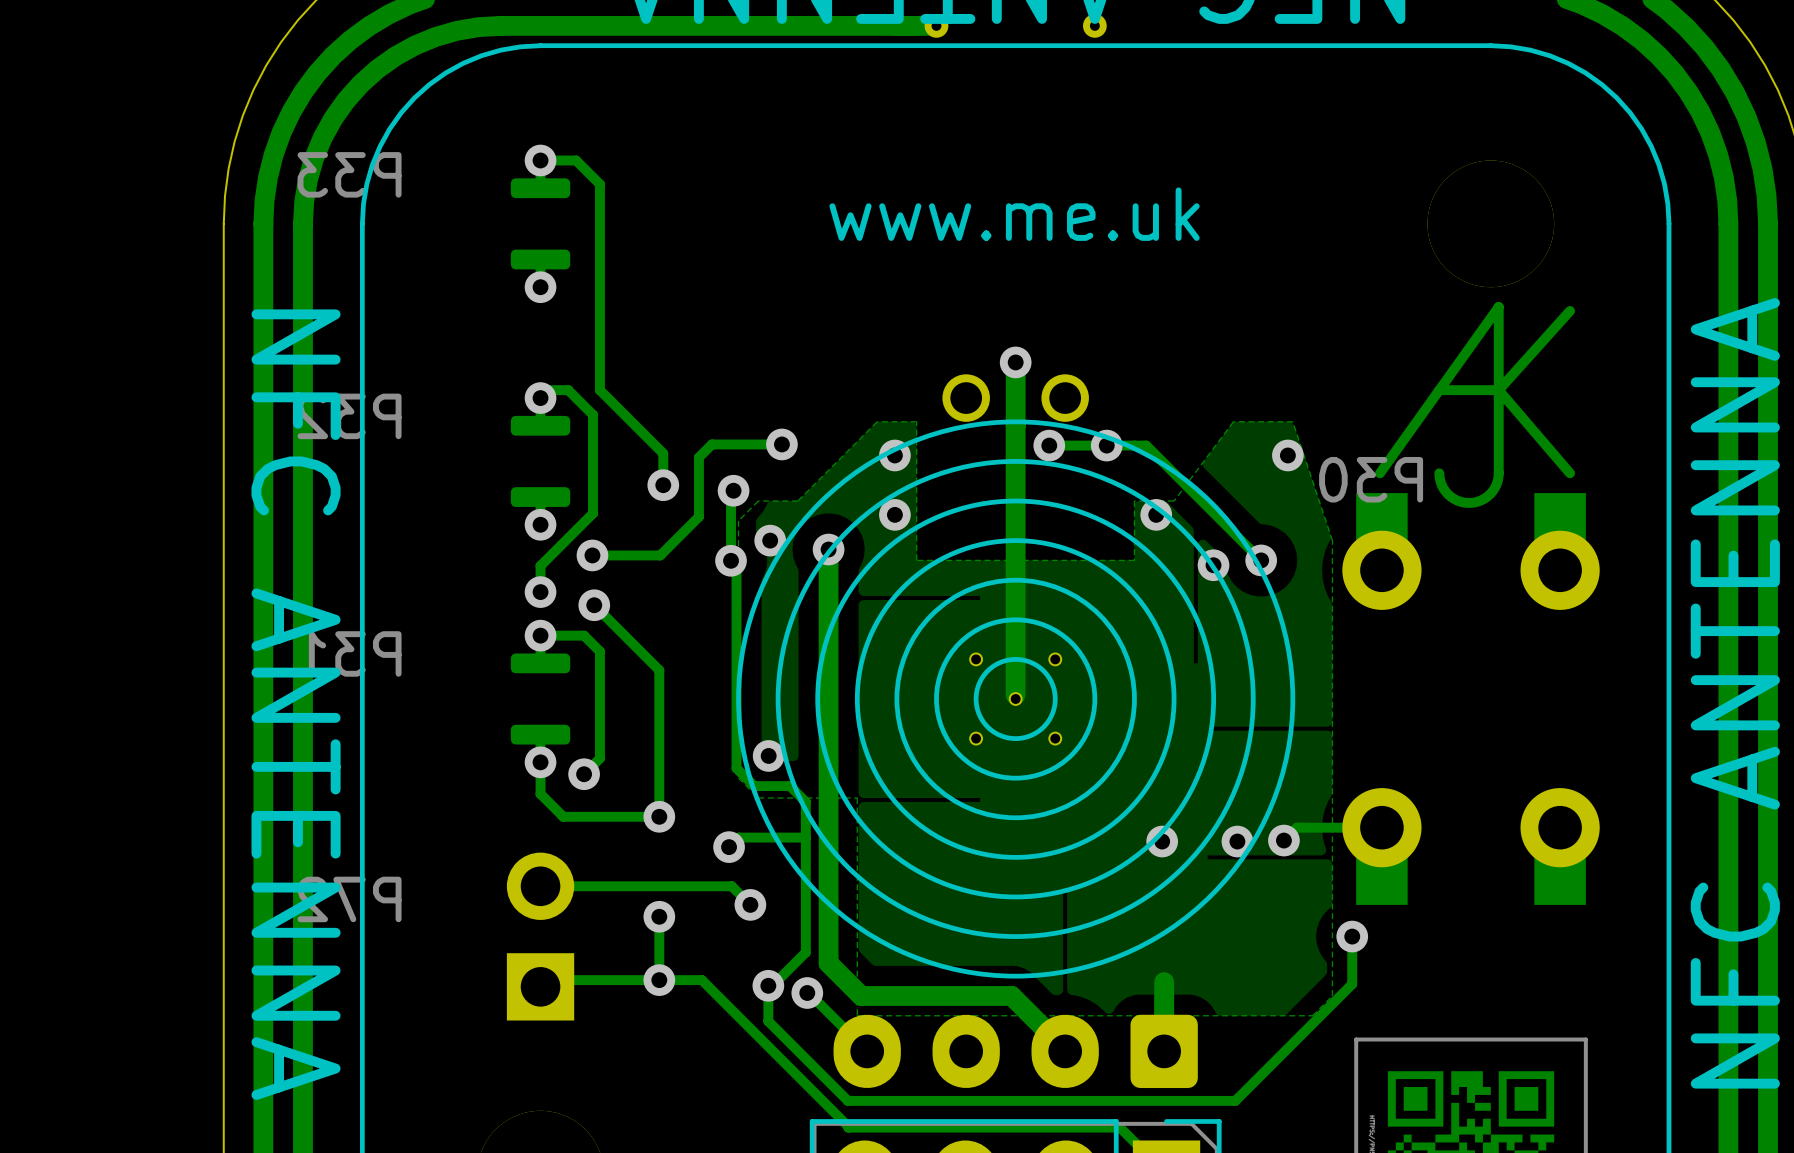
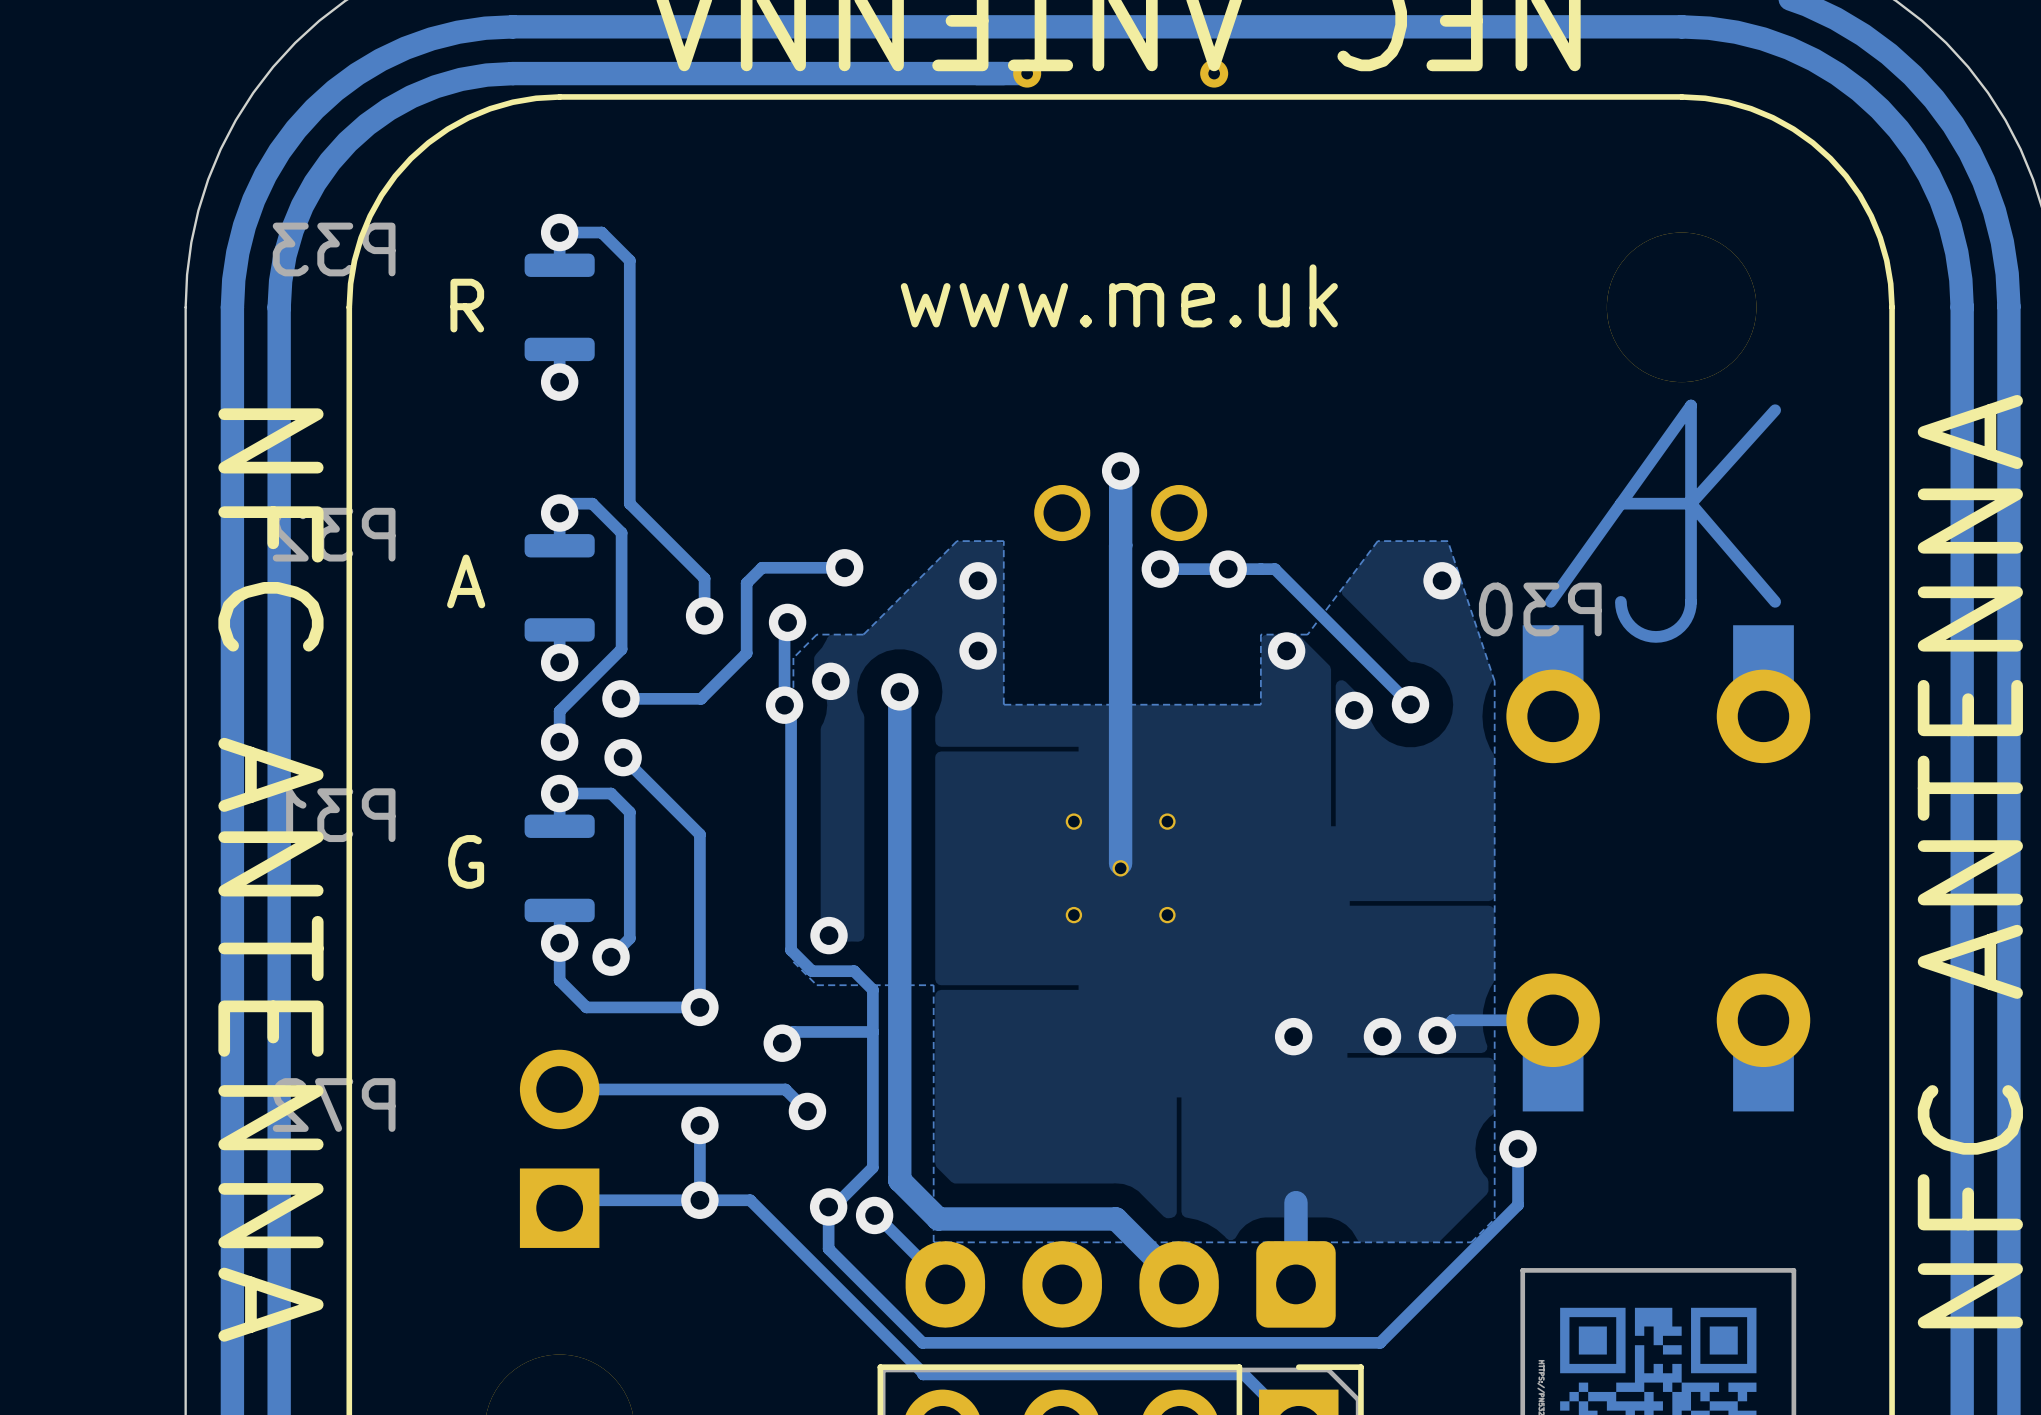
text: none -> R (467, 305)
drawing: [736, 419, 1296, 979] -> none
text: none -> A (466, 581)
text: none -> G (466, 861)

